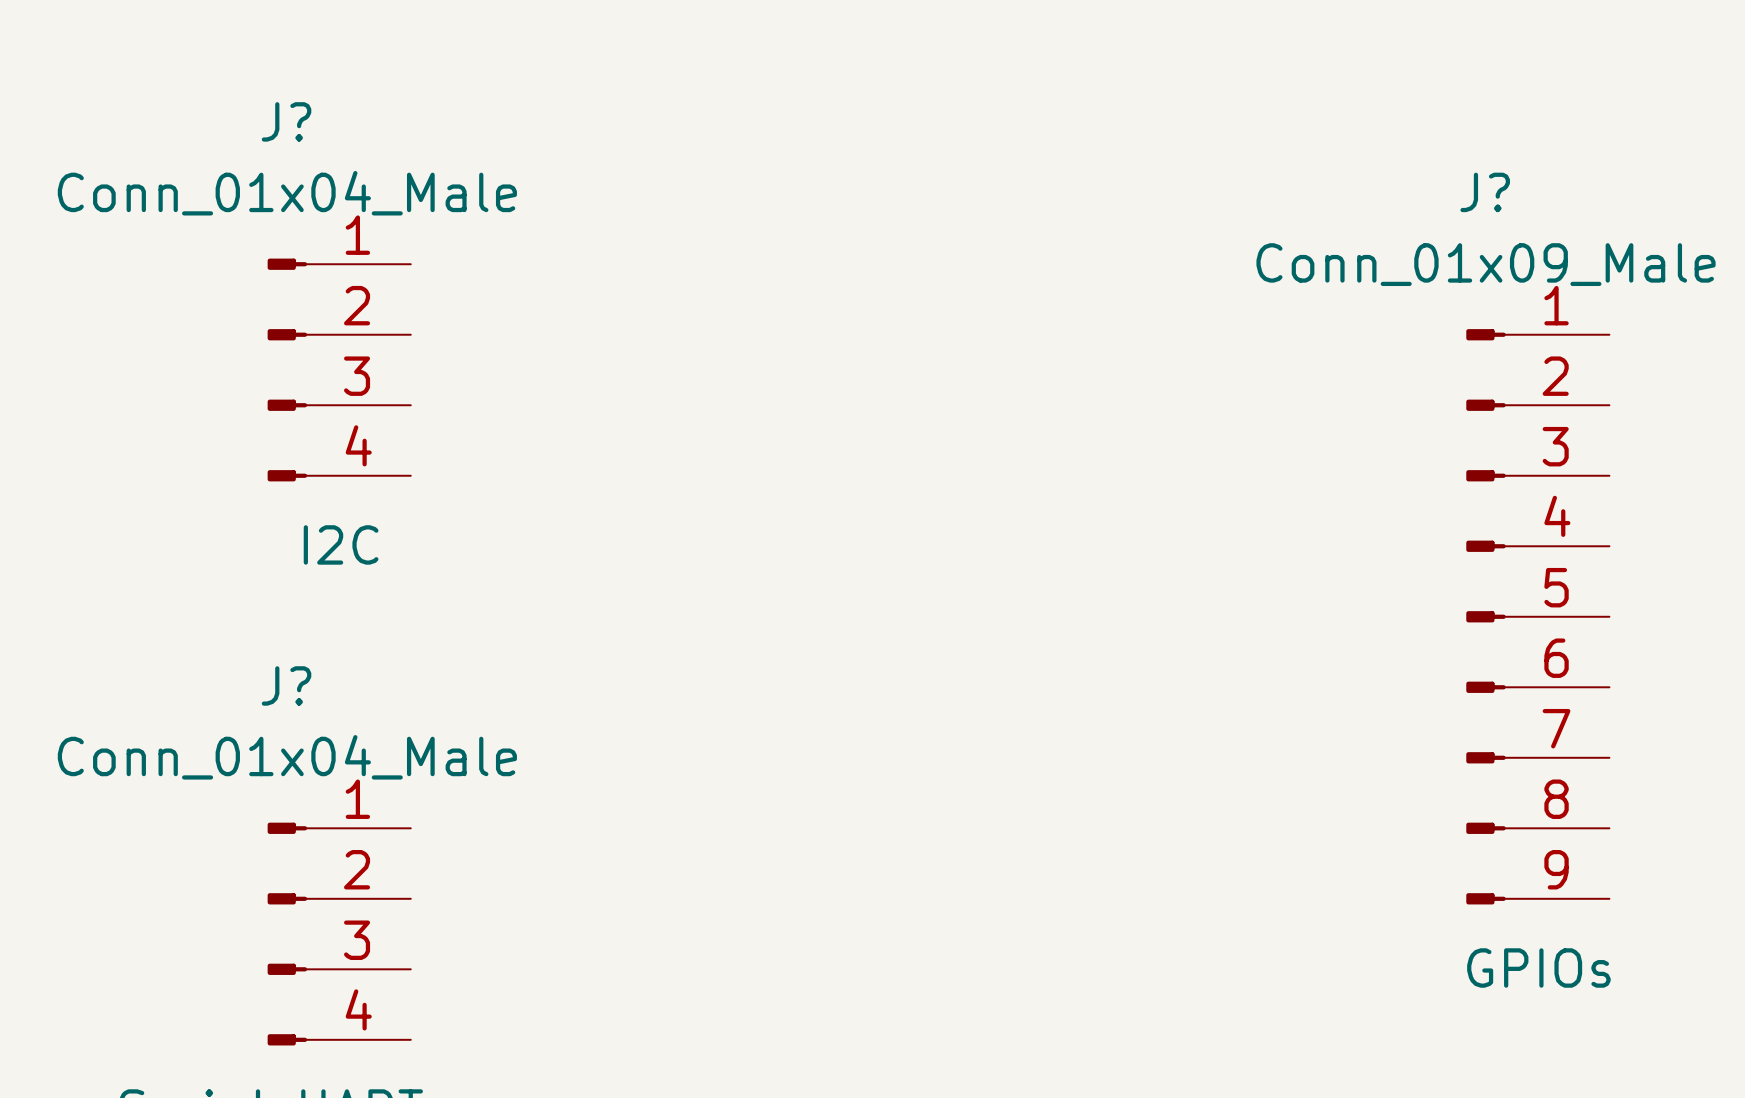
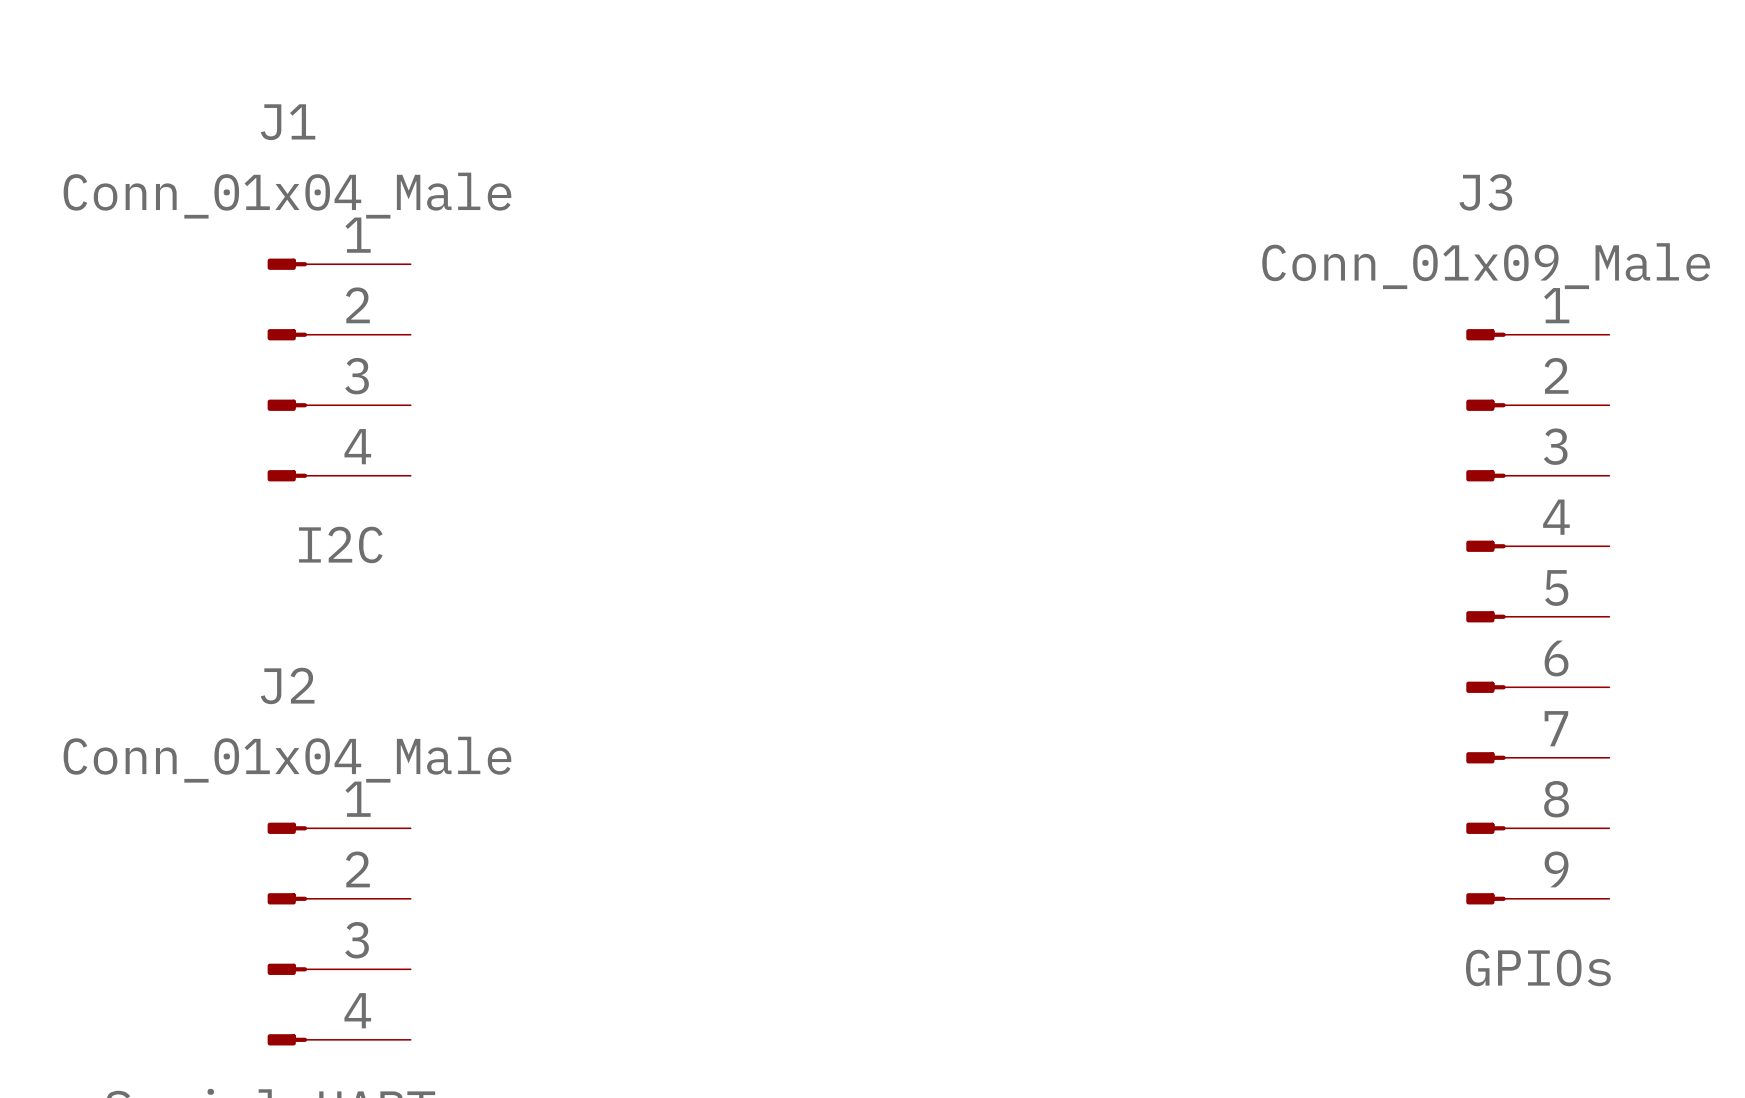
J? name: J? (286, 121) -> J1 (288, 122)
J? name: J? (1485, 192) -> J3 (1485, 192)
J? name: J? (286, 685) -> J2 (287, 685)

